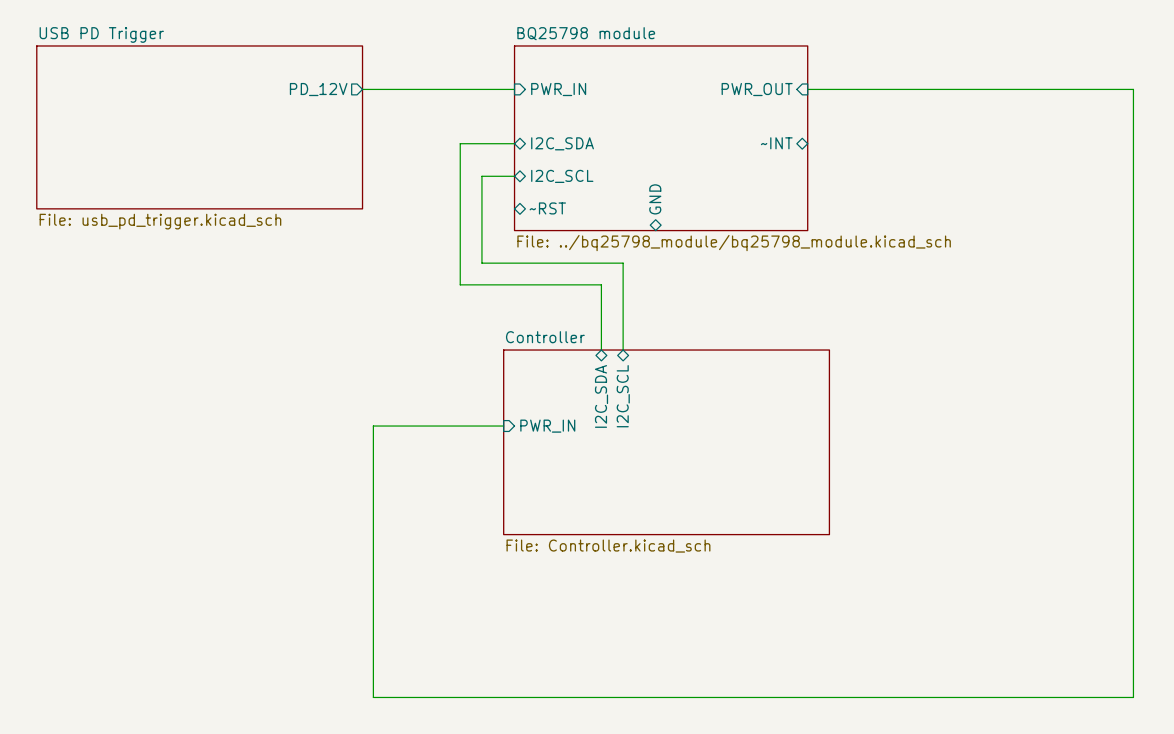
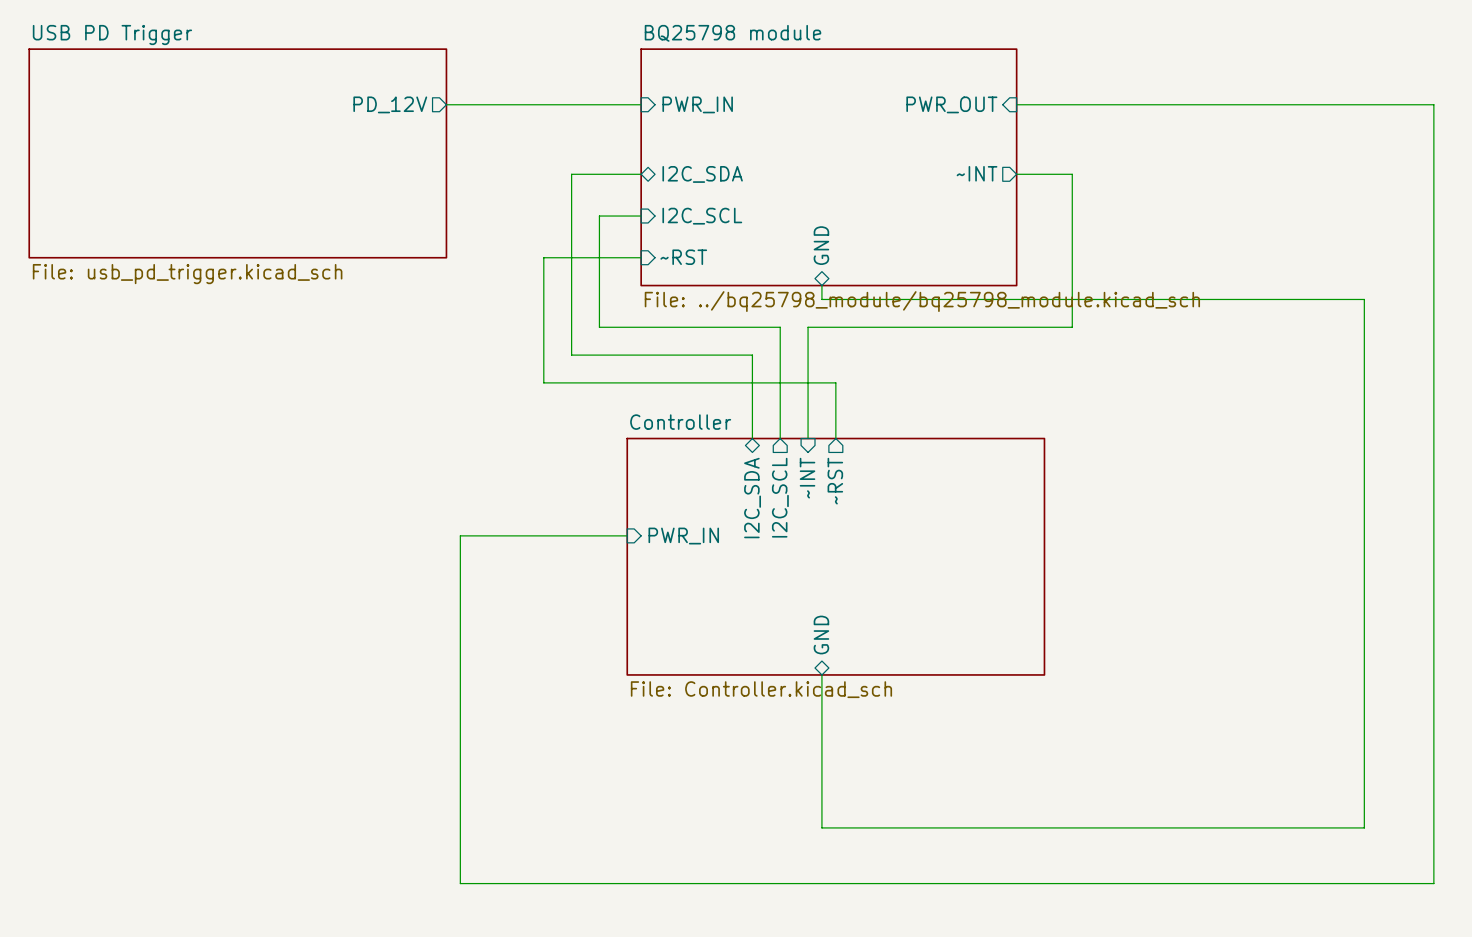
sheet pin shape: bidirectional (776, 143) -> output (977, 173)
wire: none -> (1016, 174) (1072, 174) (1072, 327) (808, 327) (808, 438)
sheet pin shape: bidirectional (562, 176) -> input (702, 216)
wire: none -> (641, 257) (543, 257) (543, 382) (835, 382) (835, 438)
sheet pin shape: bidirectional (547, 208) -> input (683, 257)
wire: none -> (821, 285) (821, 299) (1364, 299) (1364, 827) (821, 827) (821, 674)
sheet pin: none -> ~INT (807, 478)
sheet pin: none -> ~RST (835, 481)
sheet pin shape: bidirectional (623, 396) -> output (780, 497)
sheet pin: none -> GND (821, 635)

